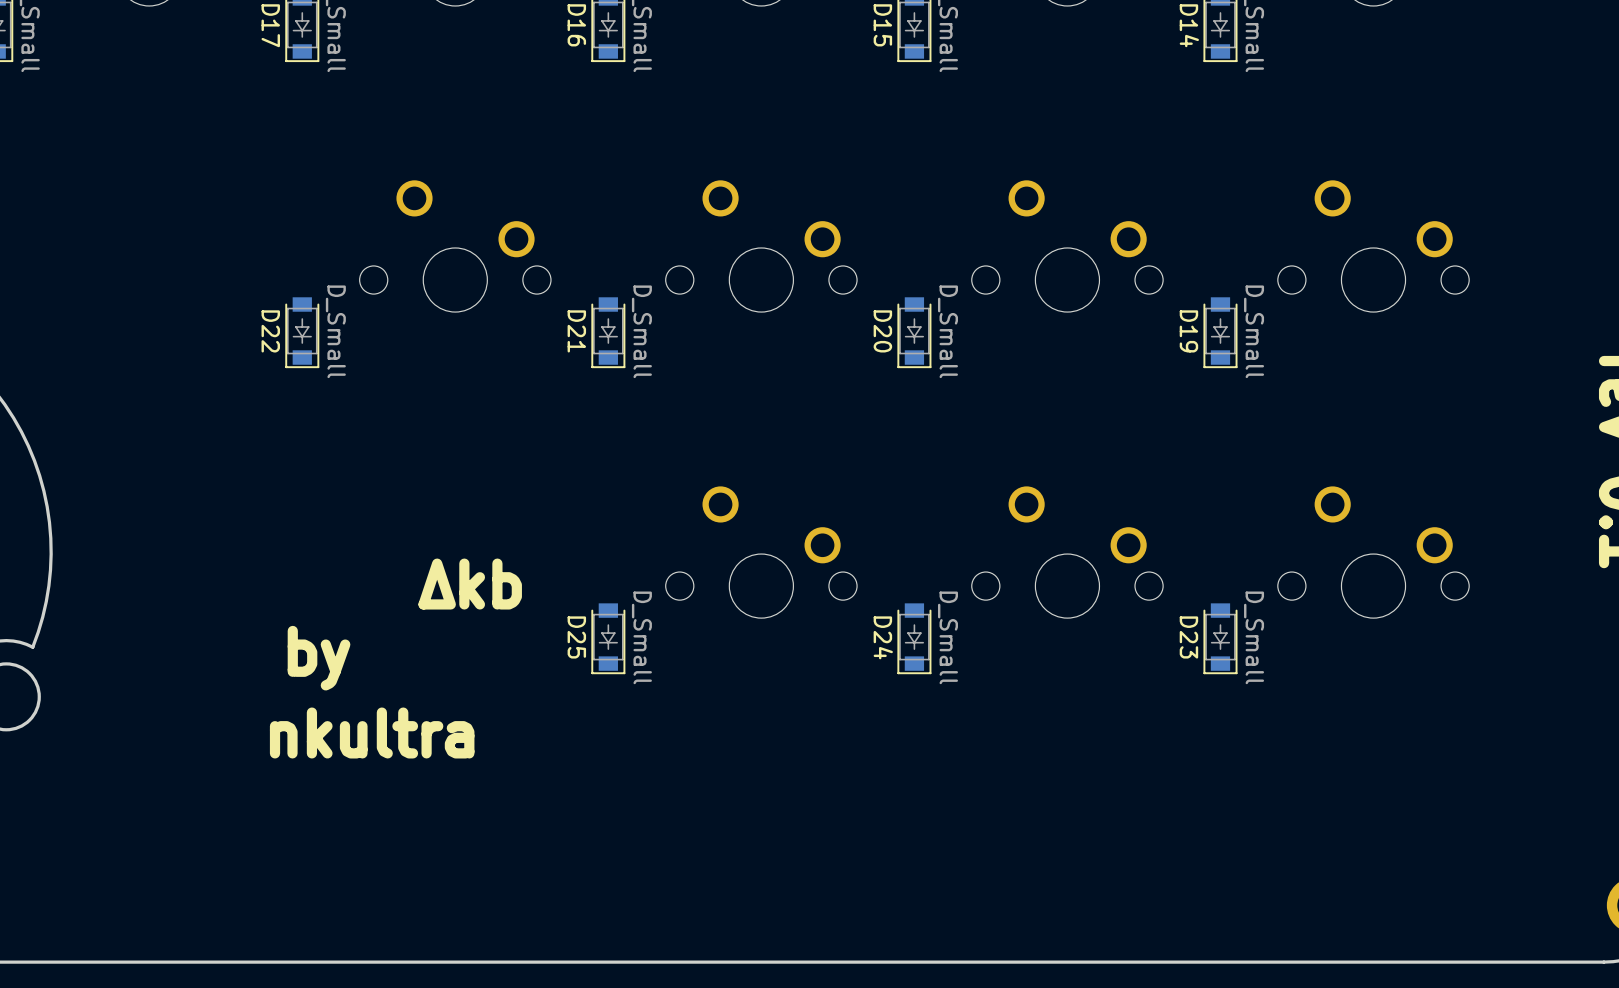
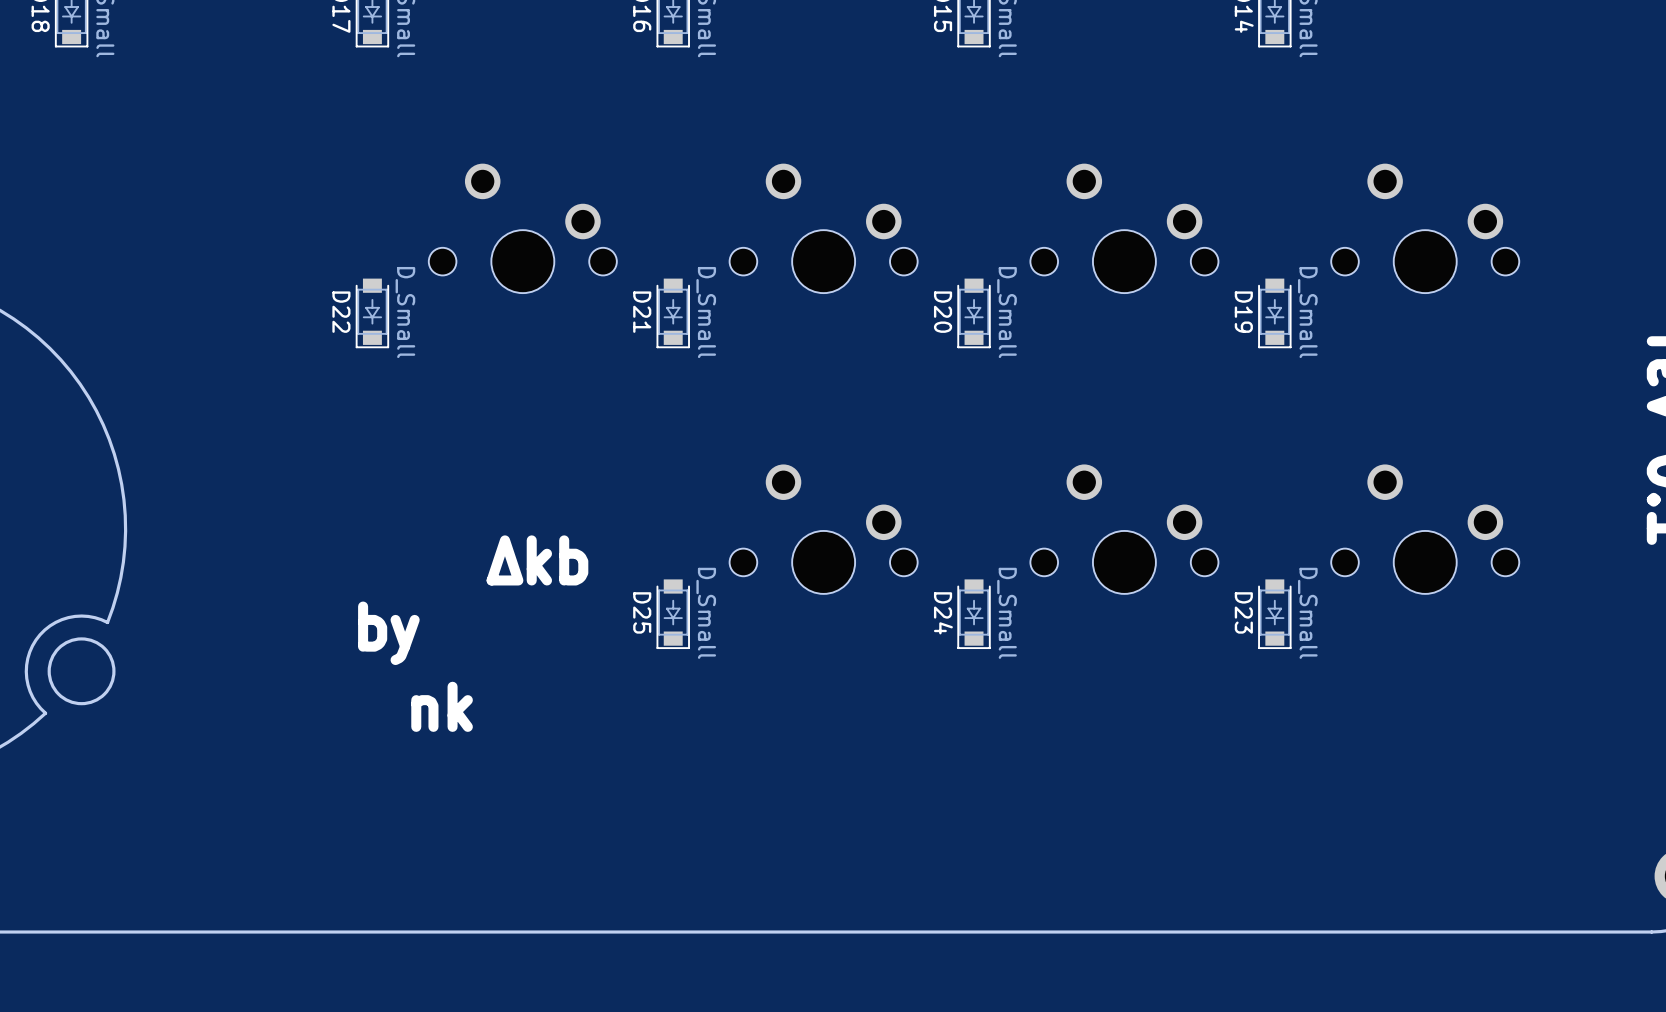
text: nkultra (372, 732) -> nk (442, 706)

